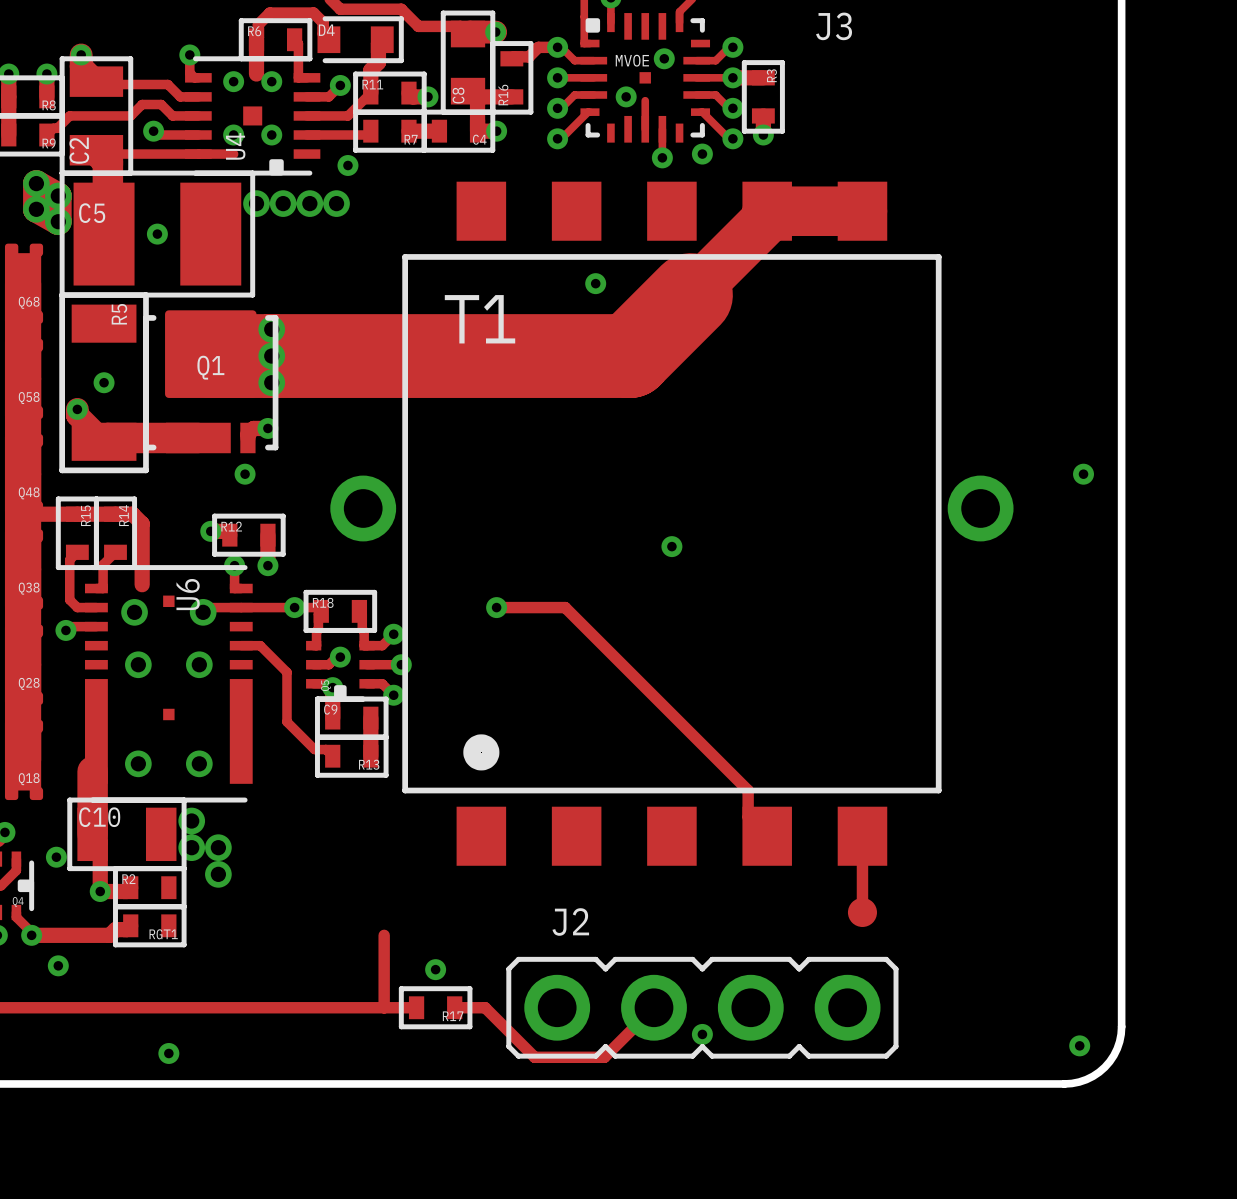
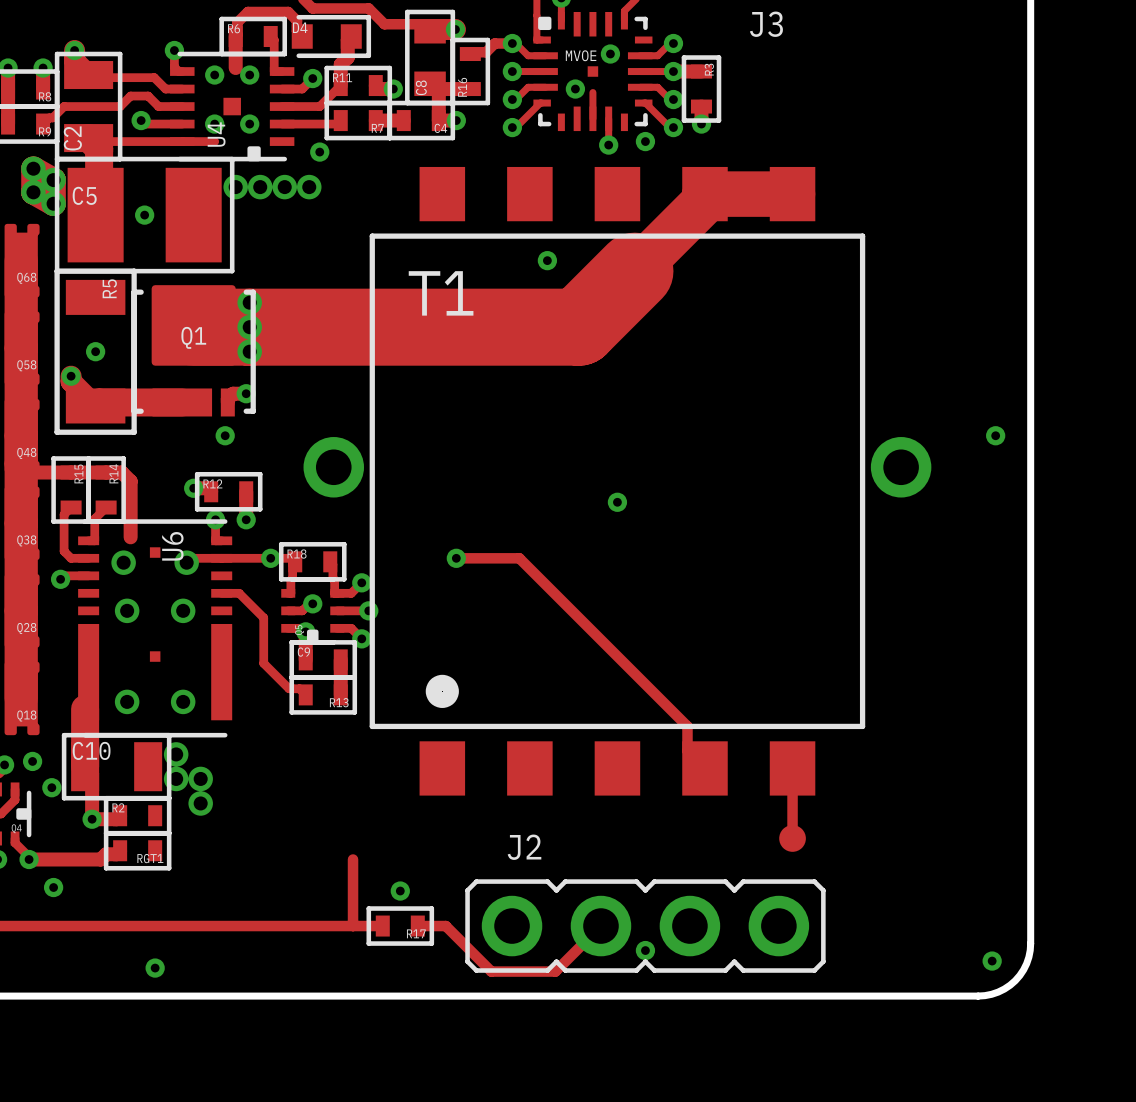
via: none -> (32, 761)

